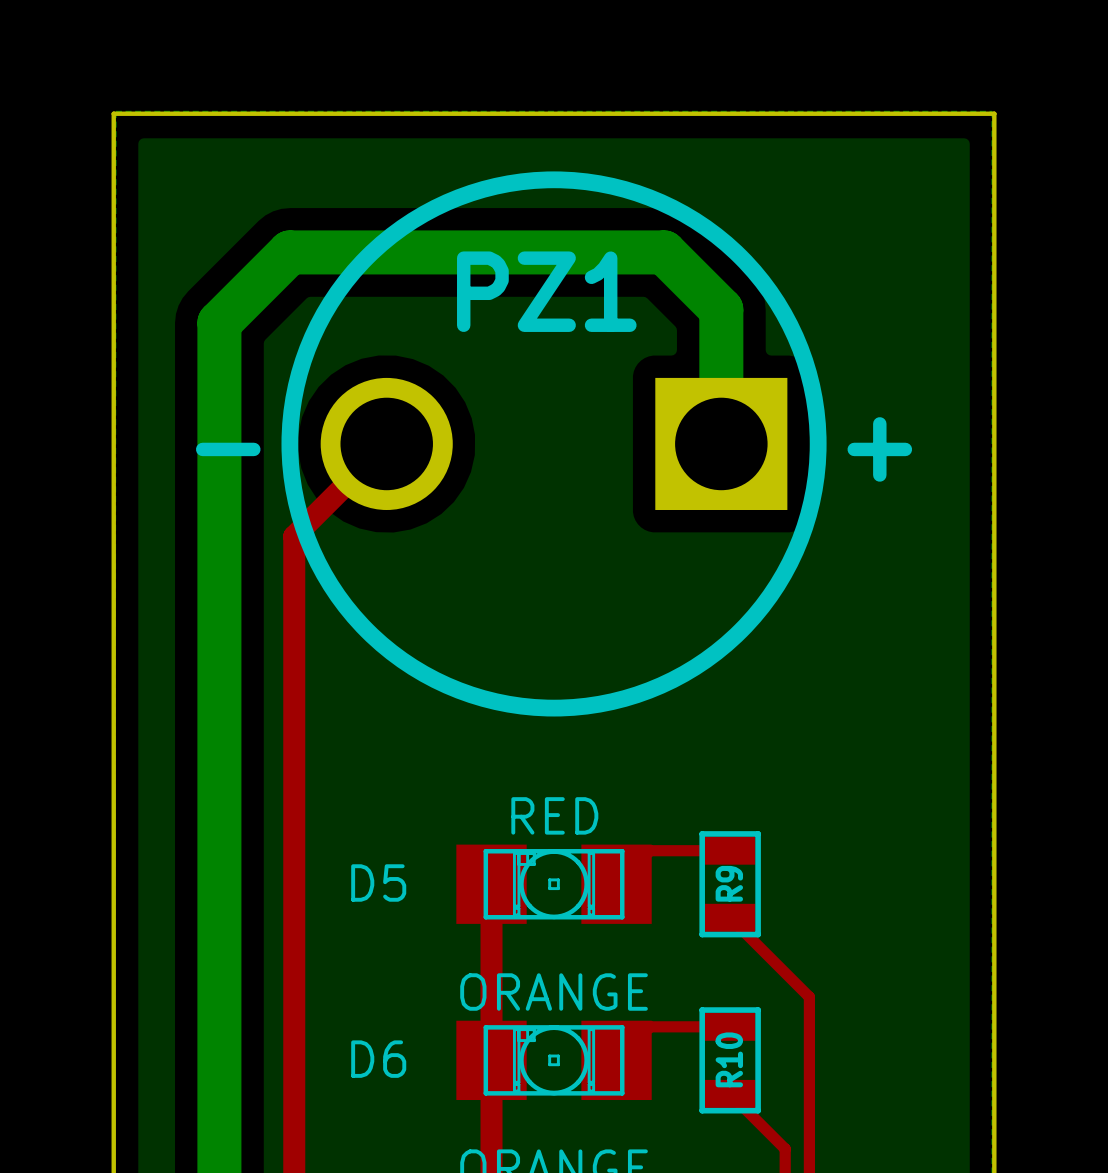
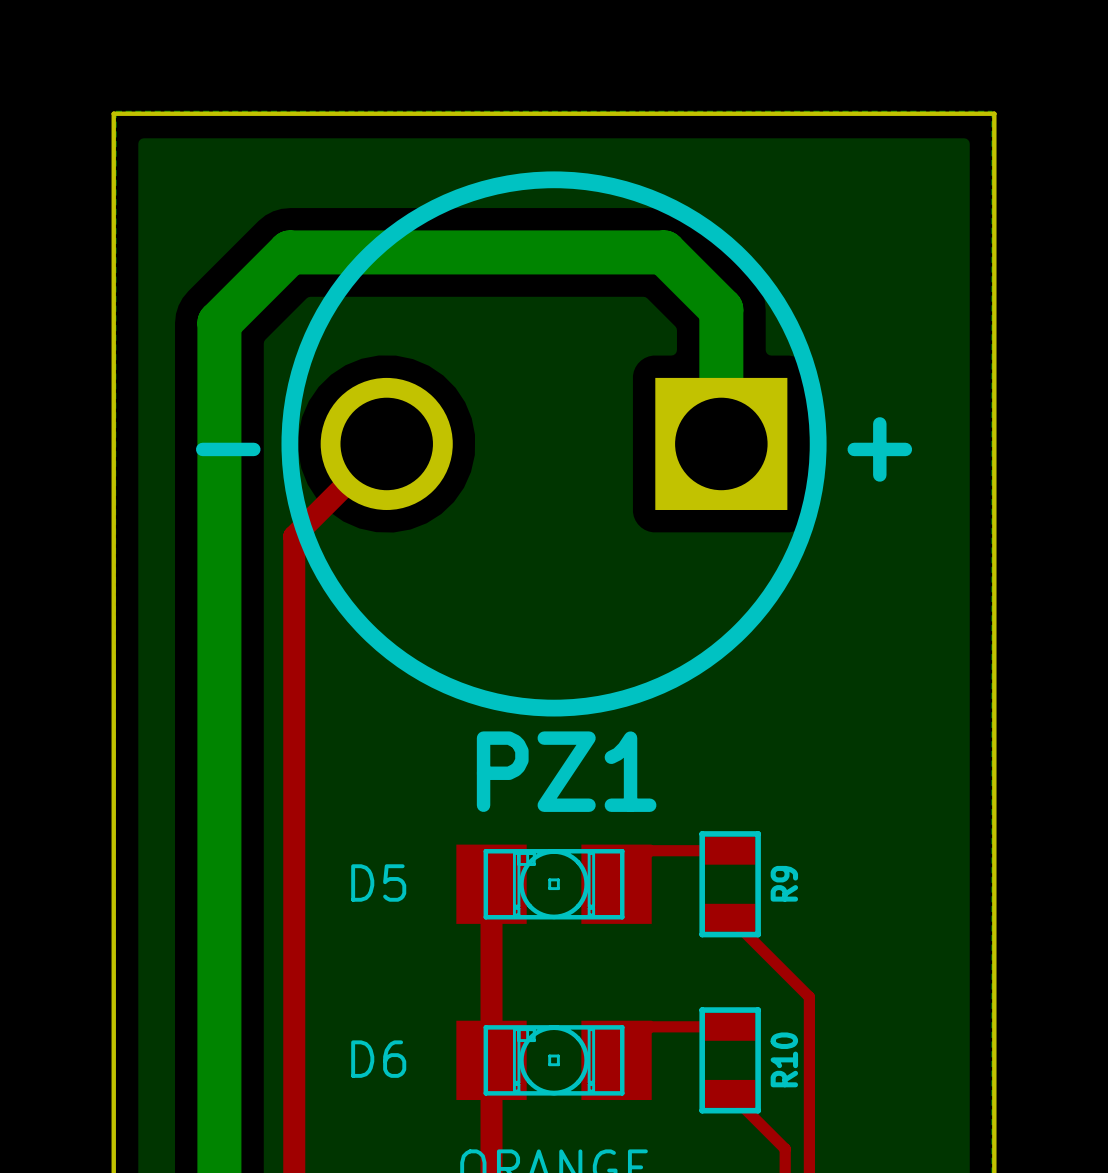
PZ1 name position: PZ1 (546, 291) -> PZ1 (566, 771)
D5 value: RED (554, 815) -> none
R9 name position: R9 (729, 883) -> R9 (784, 883)
D6 value: ORANGE (554, 992) -> none
R10 name position: R10 (729, 1059) -> R10 (784, 1059)

